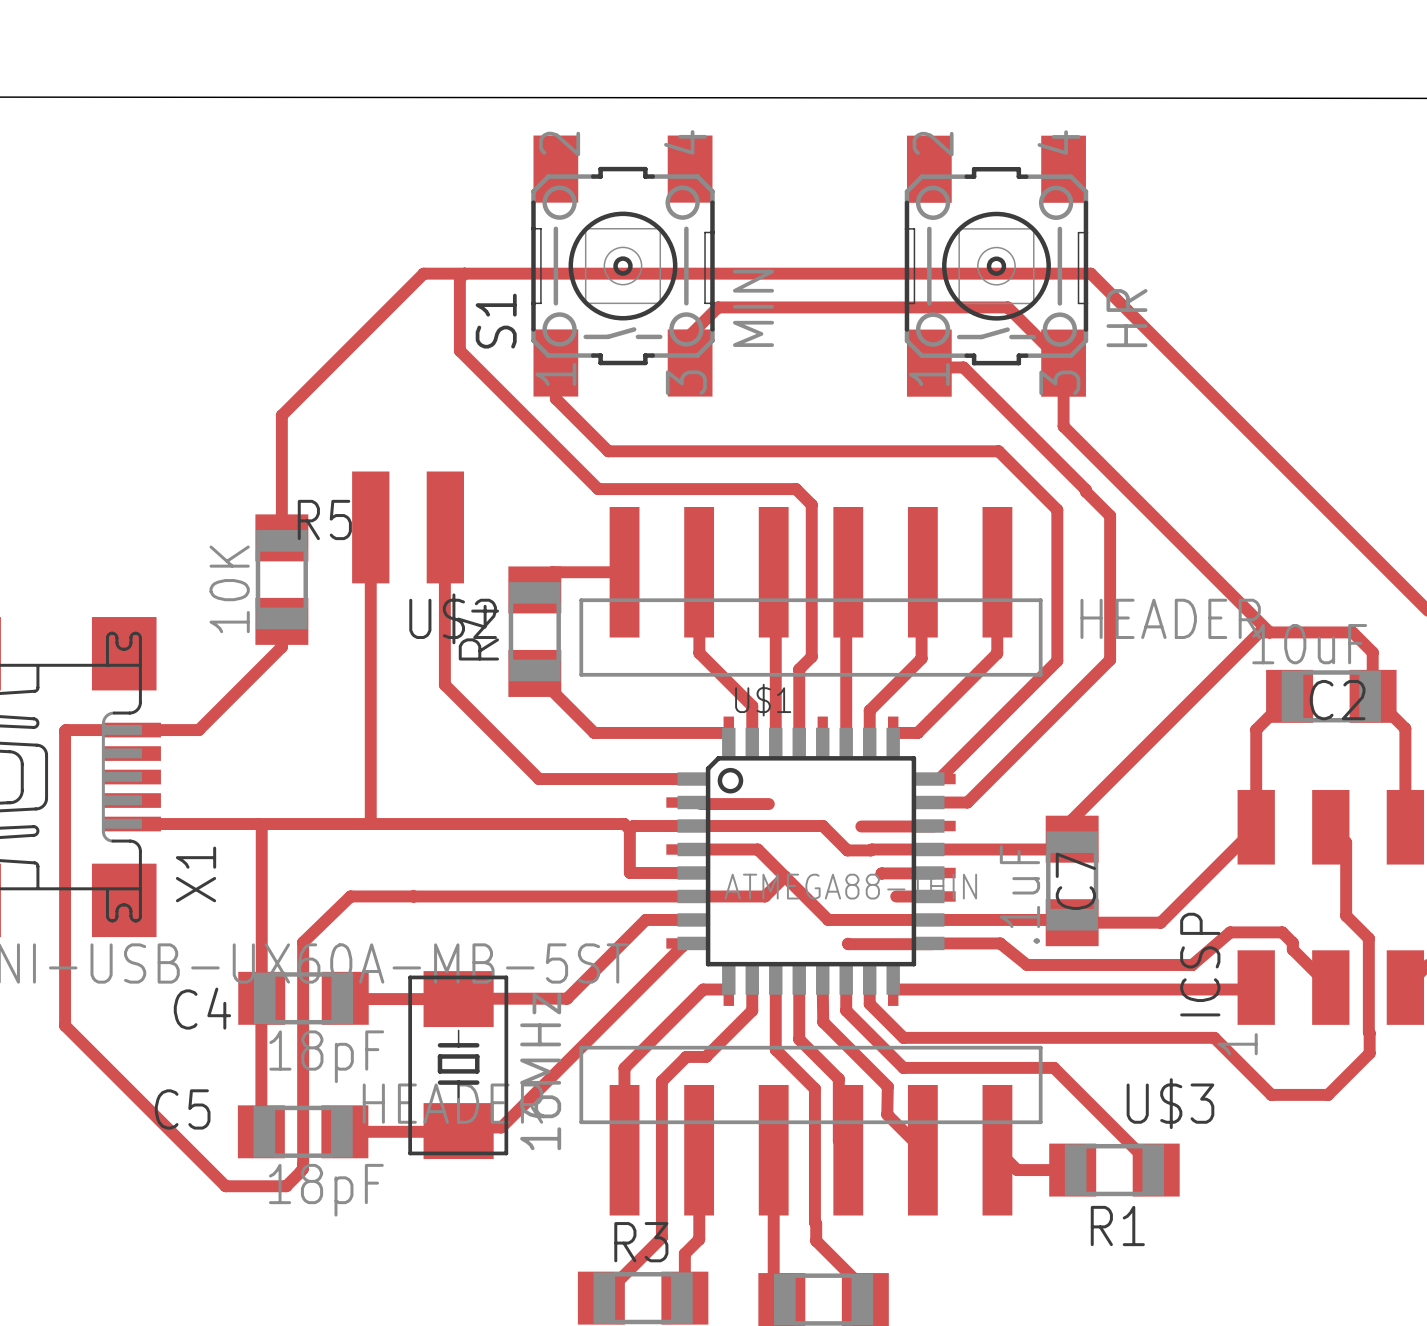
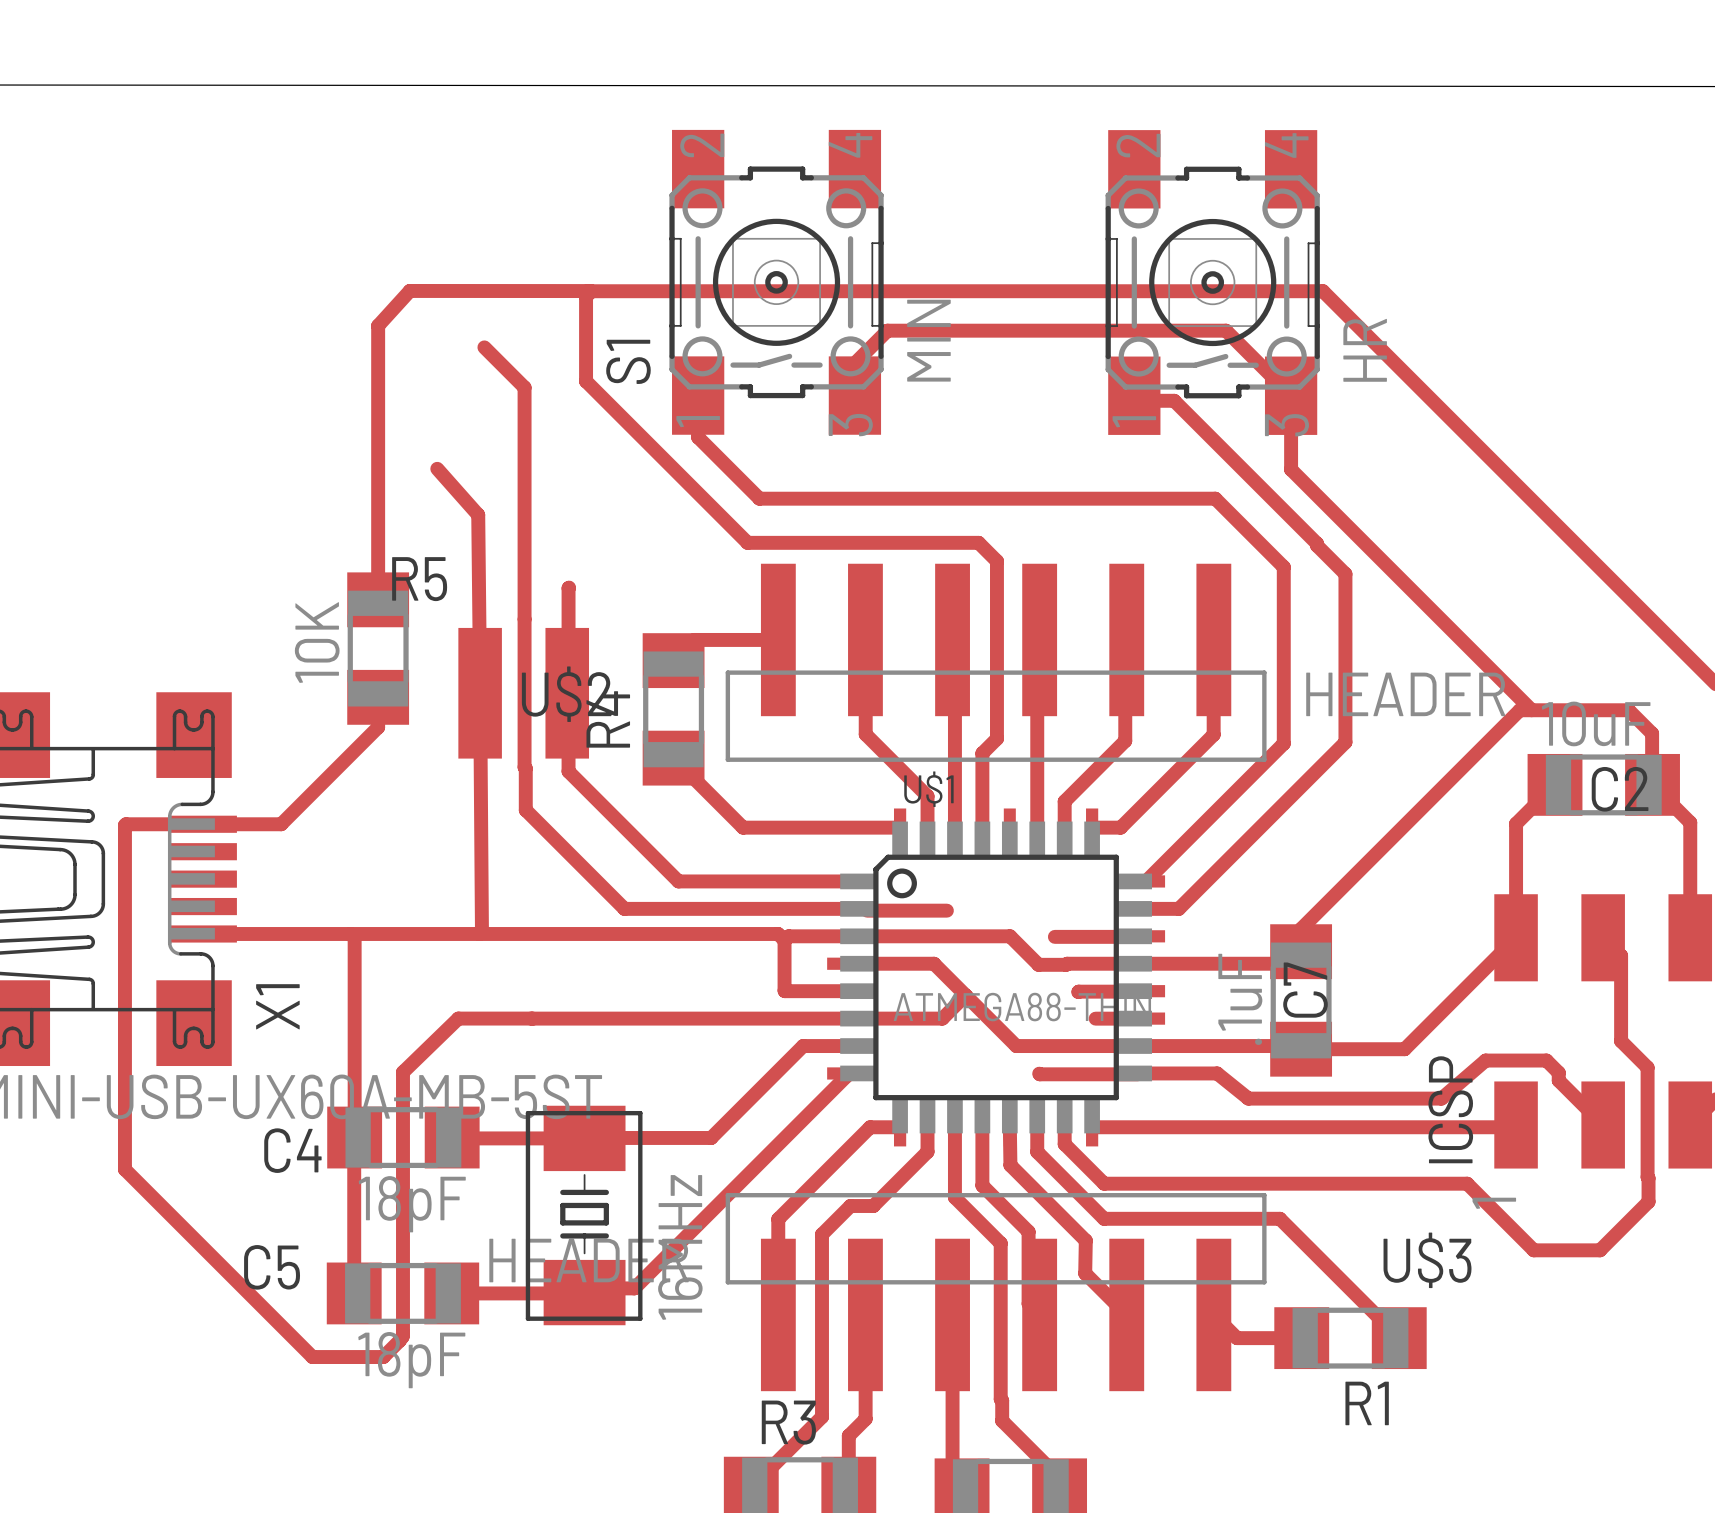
top track: (464, 273) (423, 273) (281, 415) -> (586, 296) (587, 291) (409, 290) (378, 325) (378, 456)
top track: none -> (484, 347) (524, 387) (525, 810) (624, 908) (848, 908)
top track: (370, 527) (370, 822) -> (437, 468) (478, 514) (481, 932)
part position: (408, 527) -> (523, 693)

